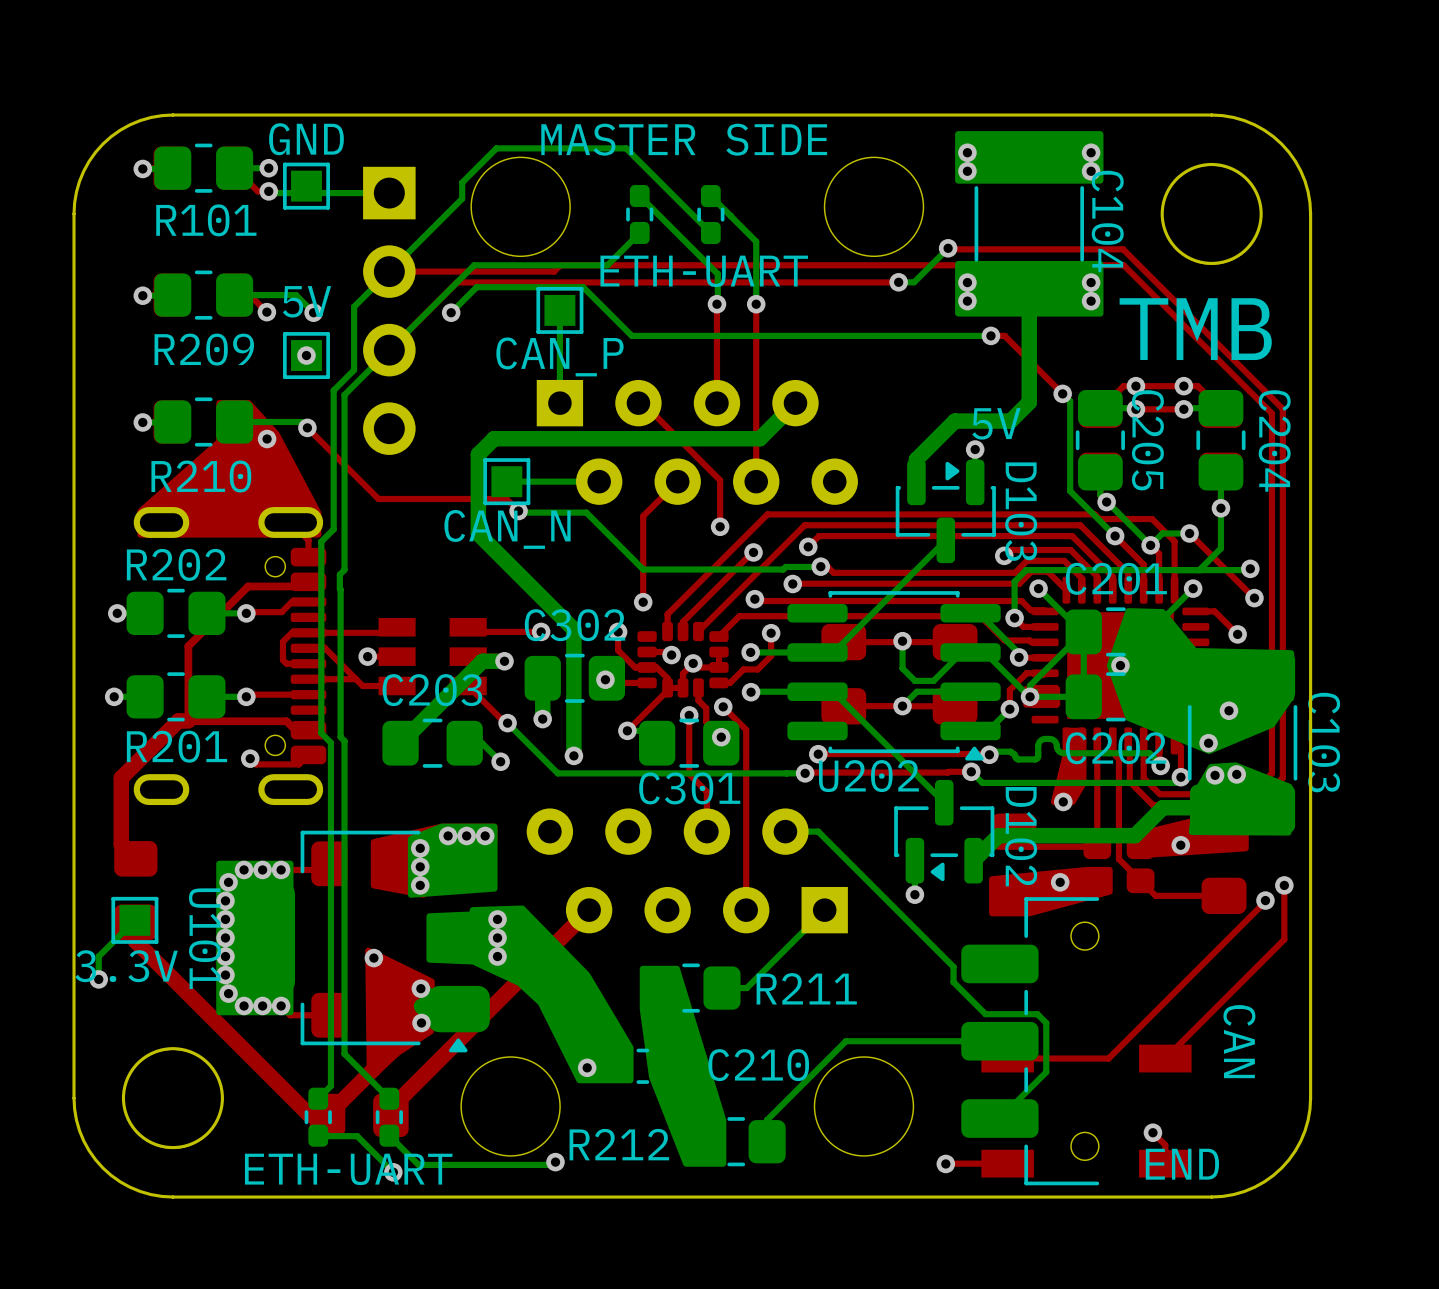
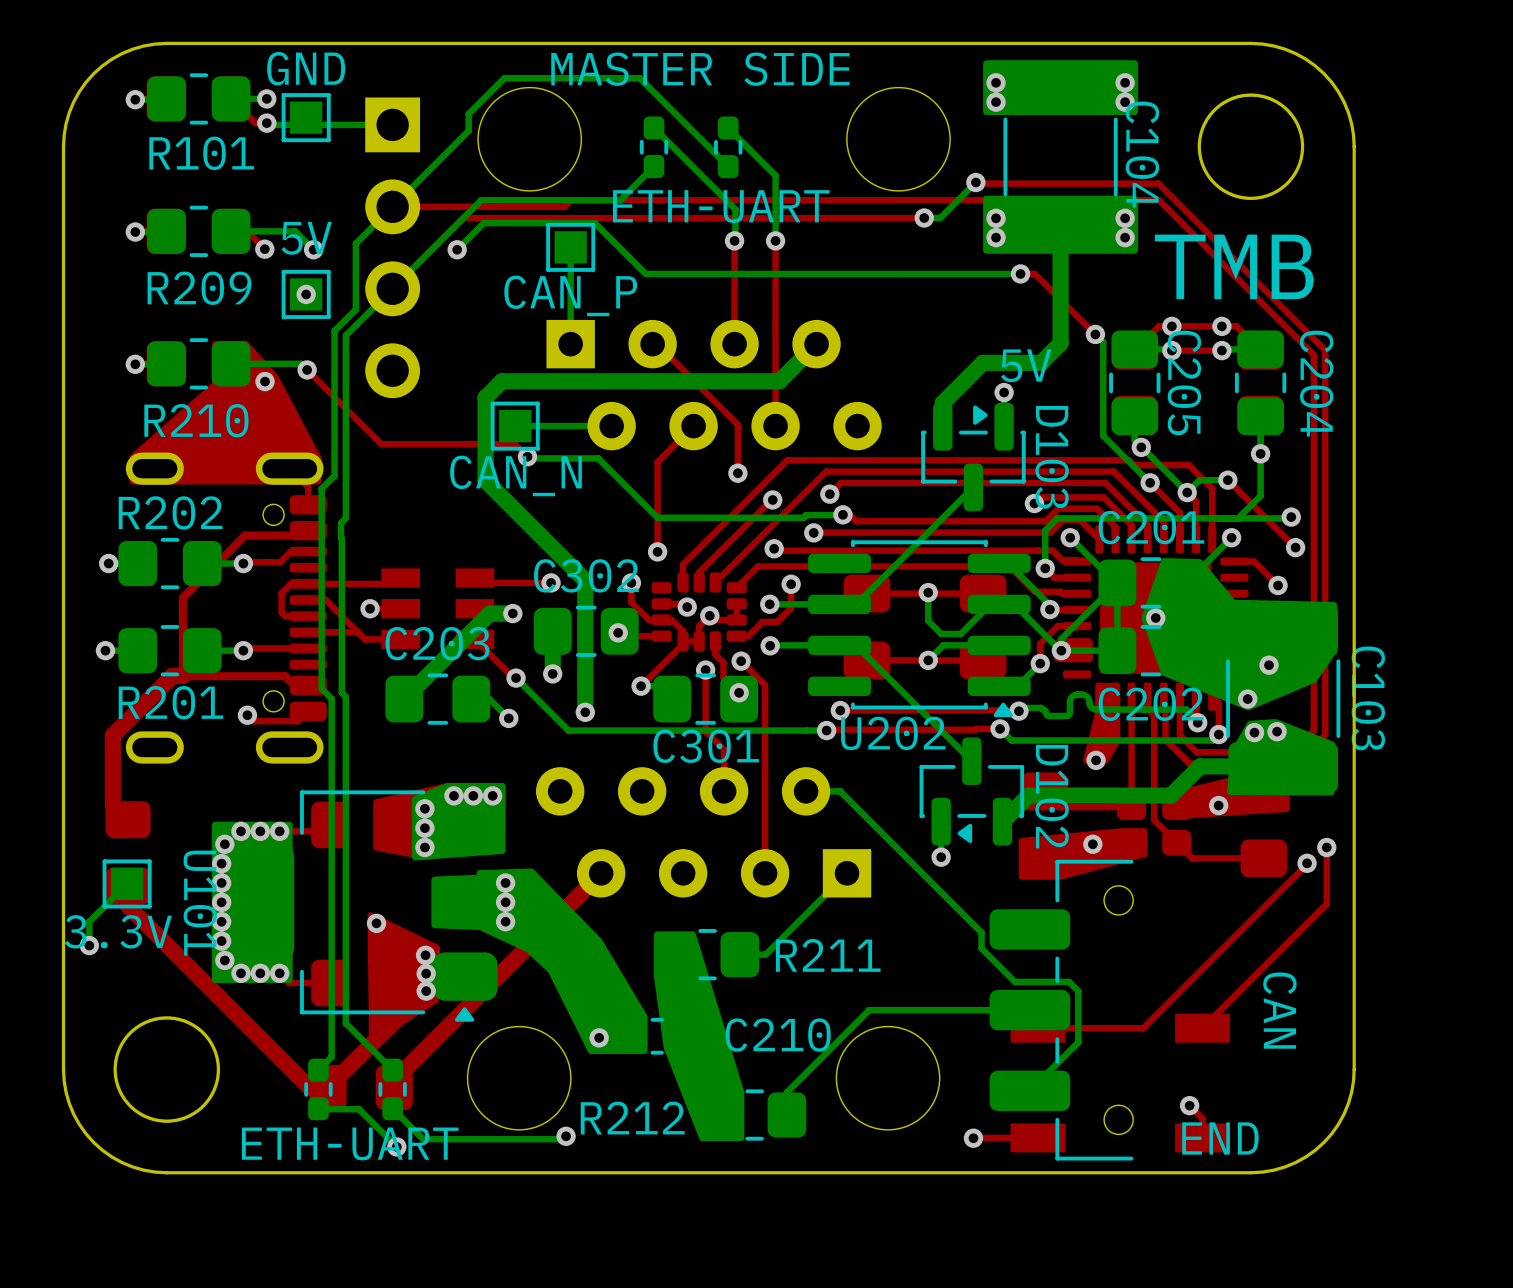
via: none -> (426, 973)

